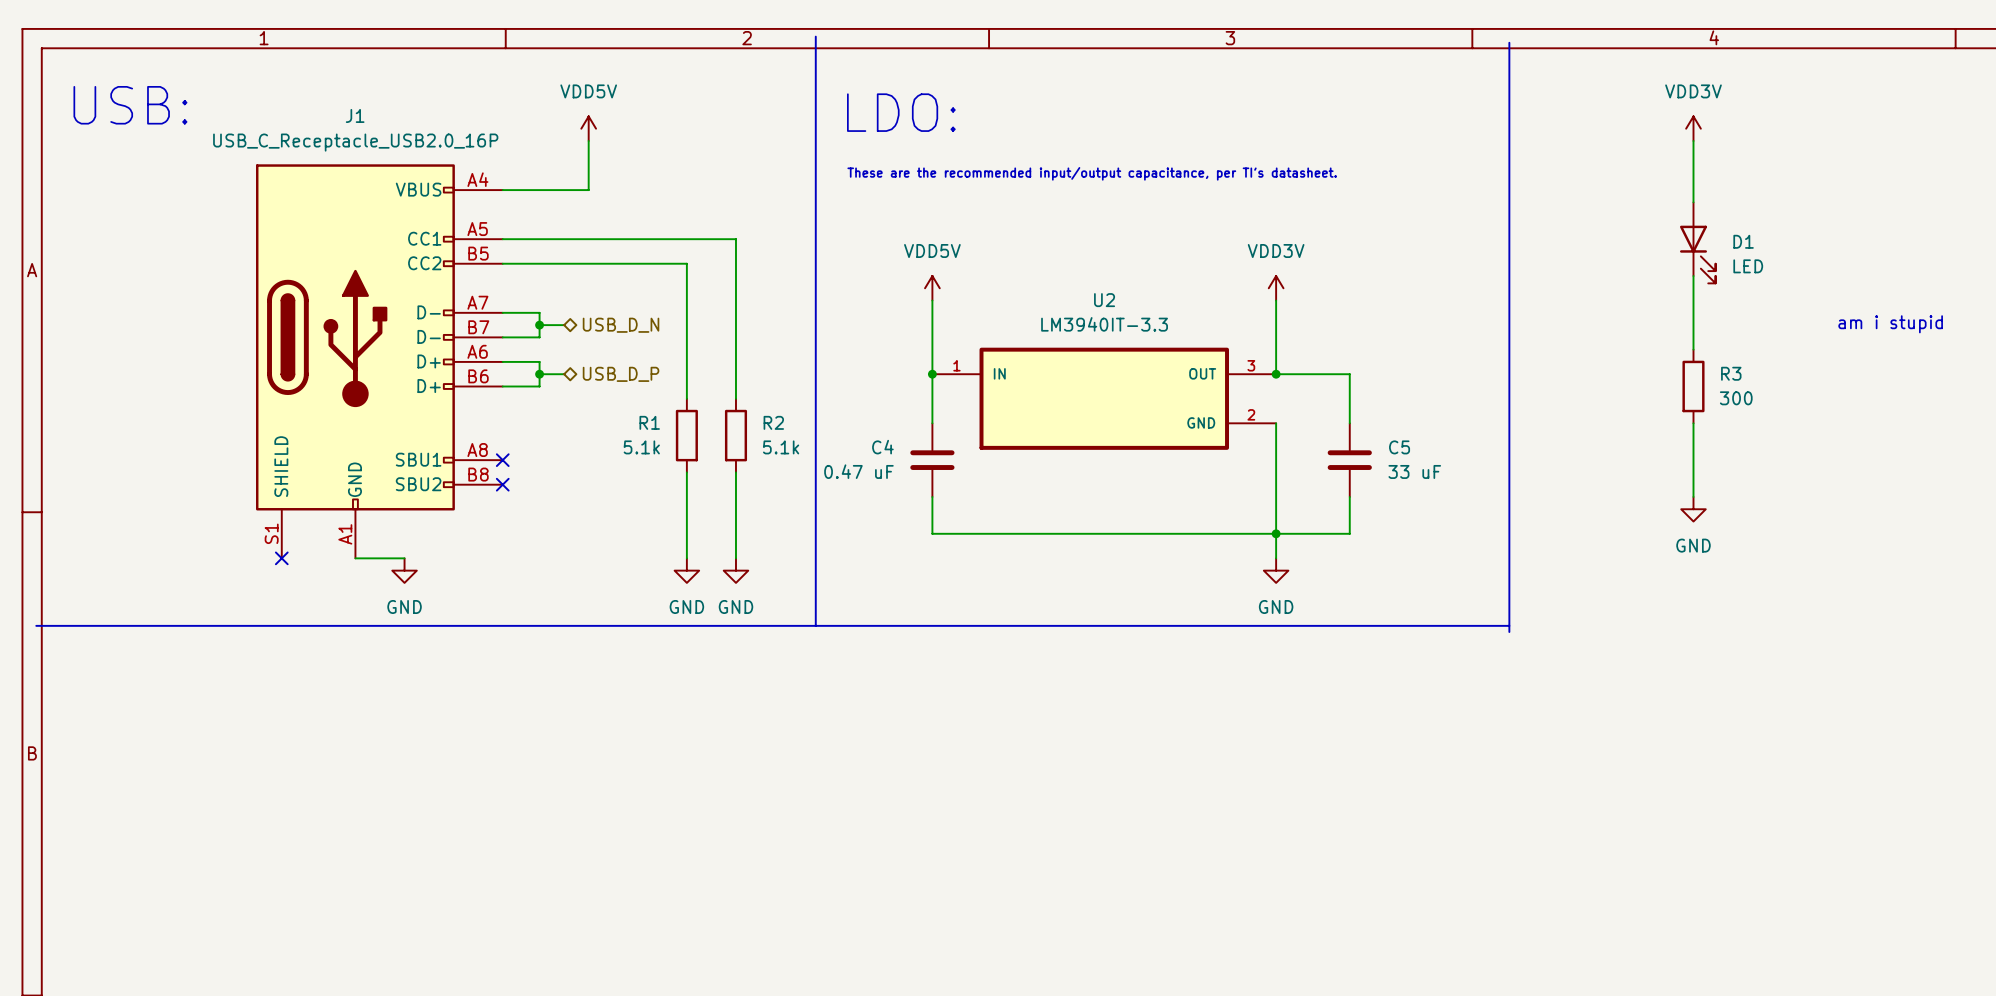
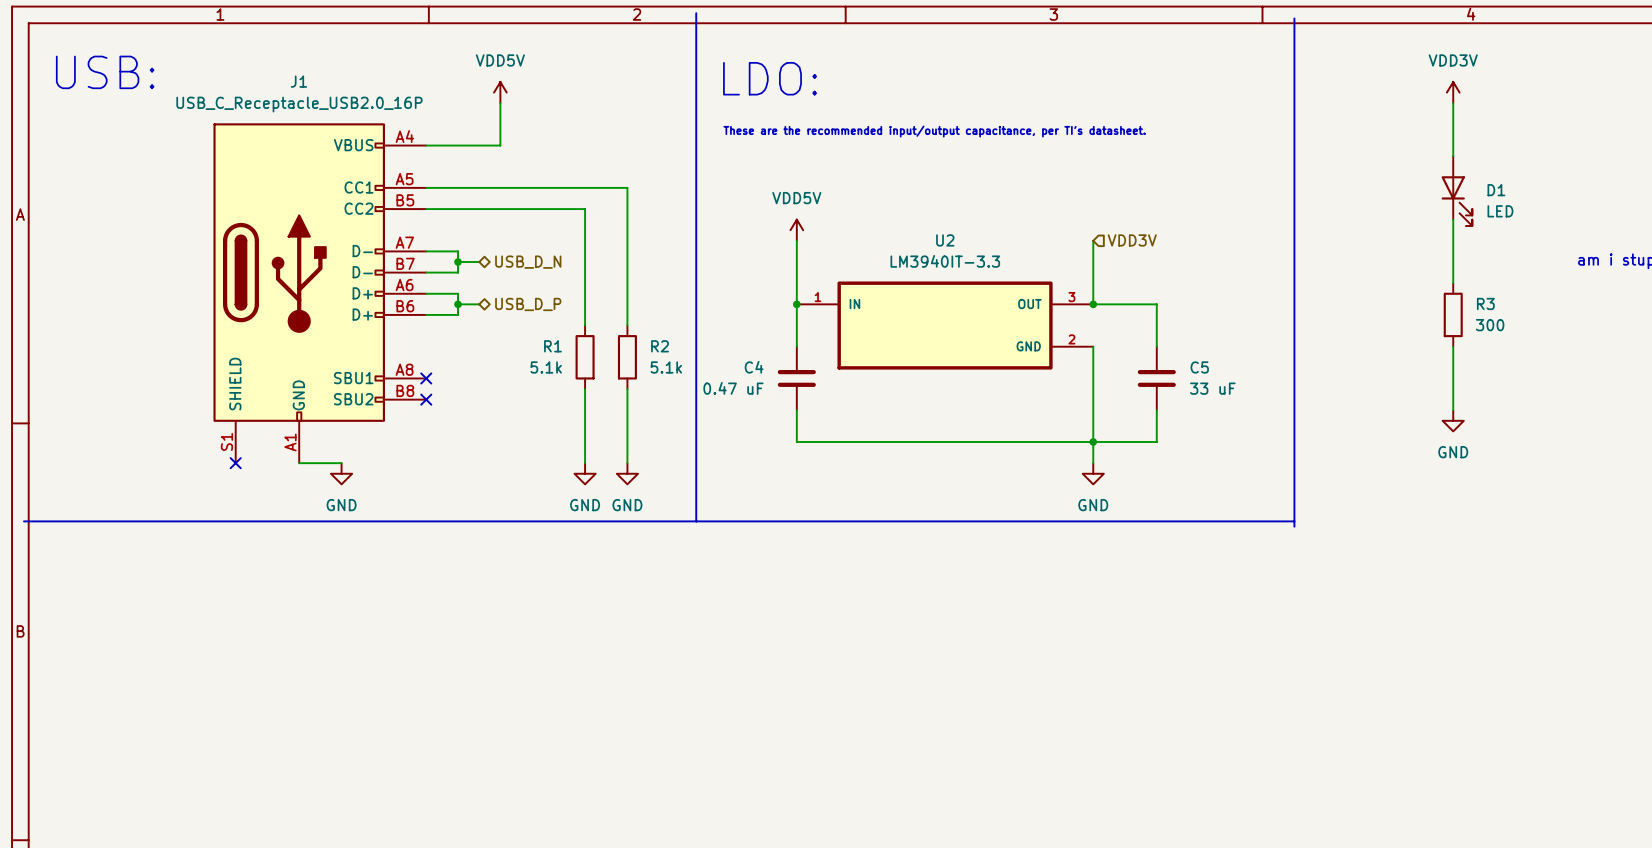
power symbol: VDD3V (1276, 288) -> none
hierarchical label: none -> VDD3V (1132, 240)

